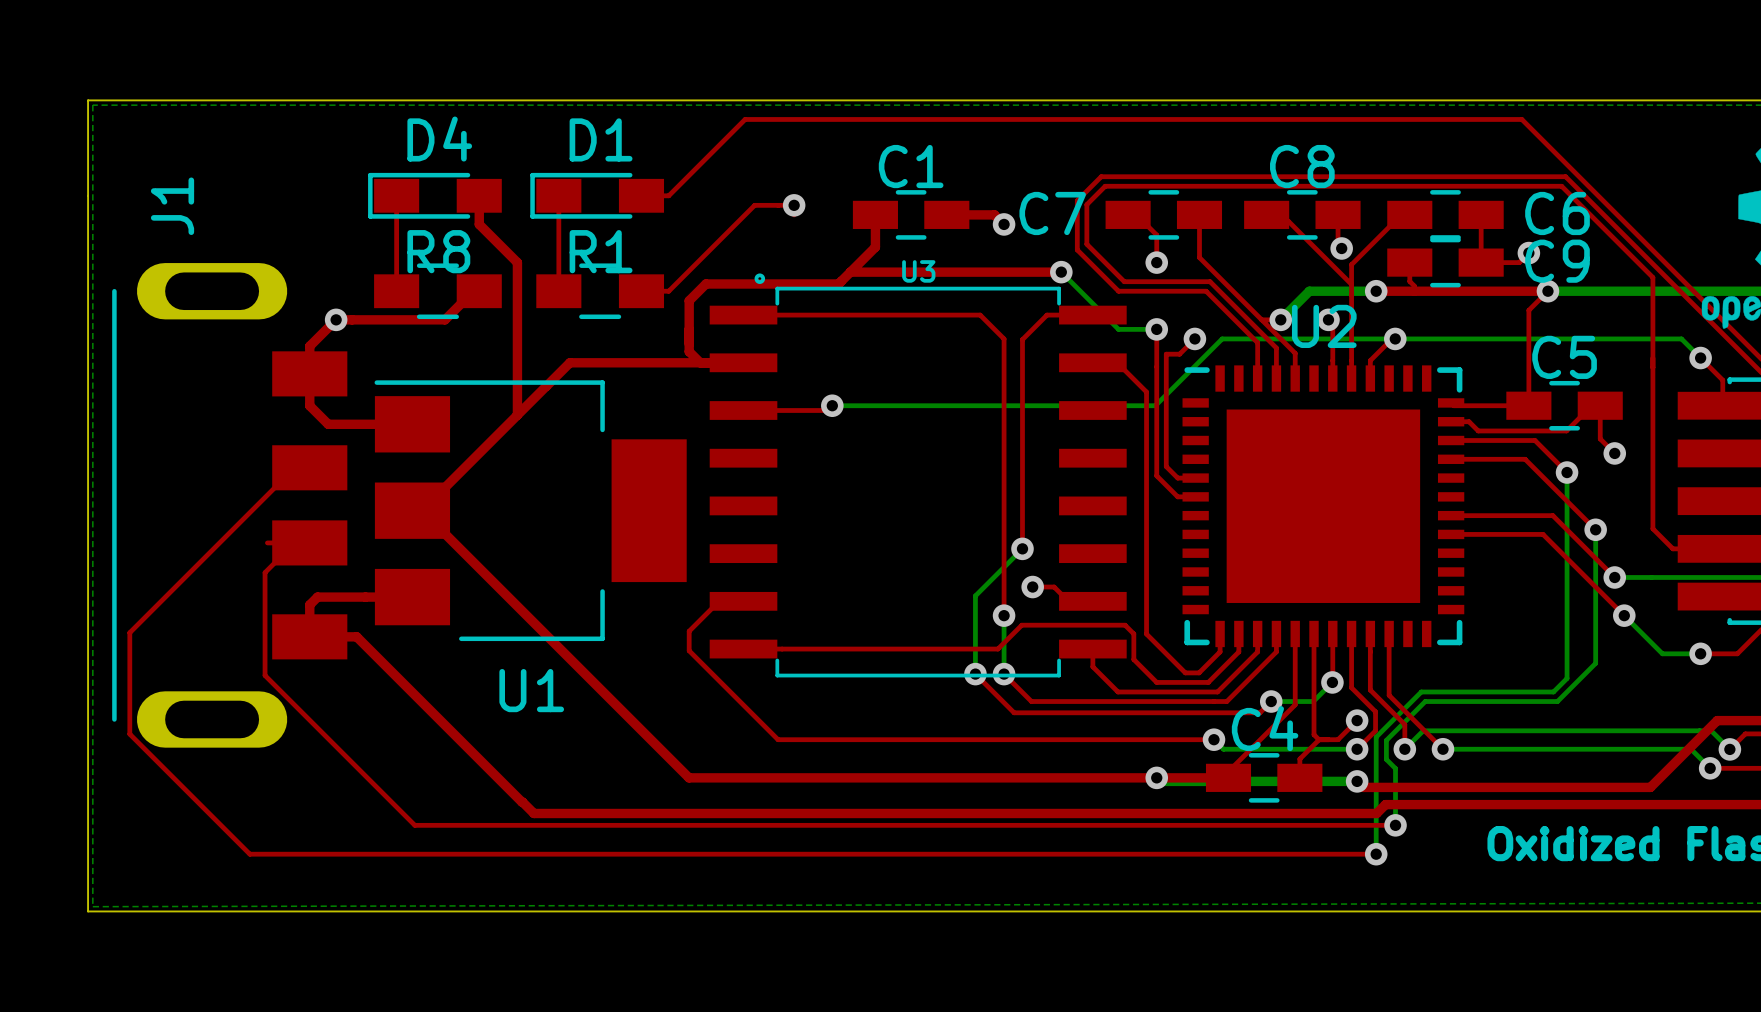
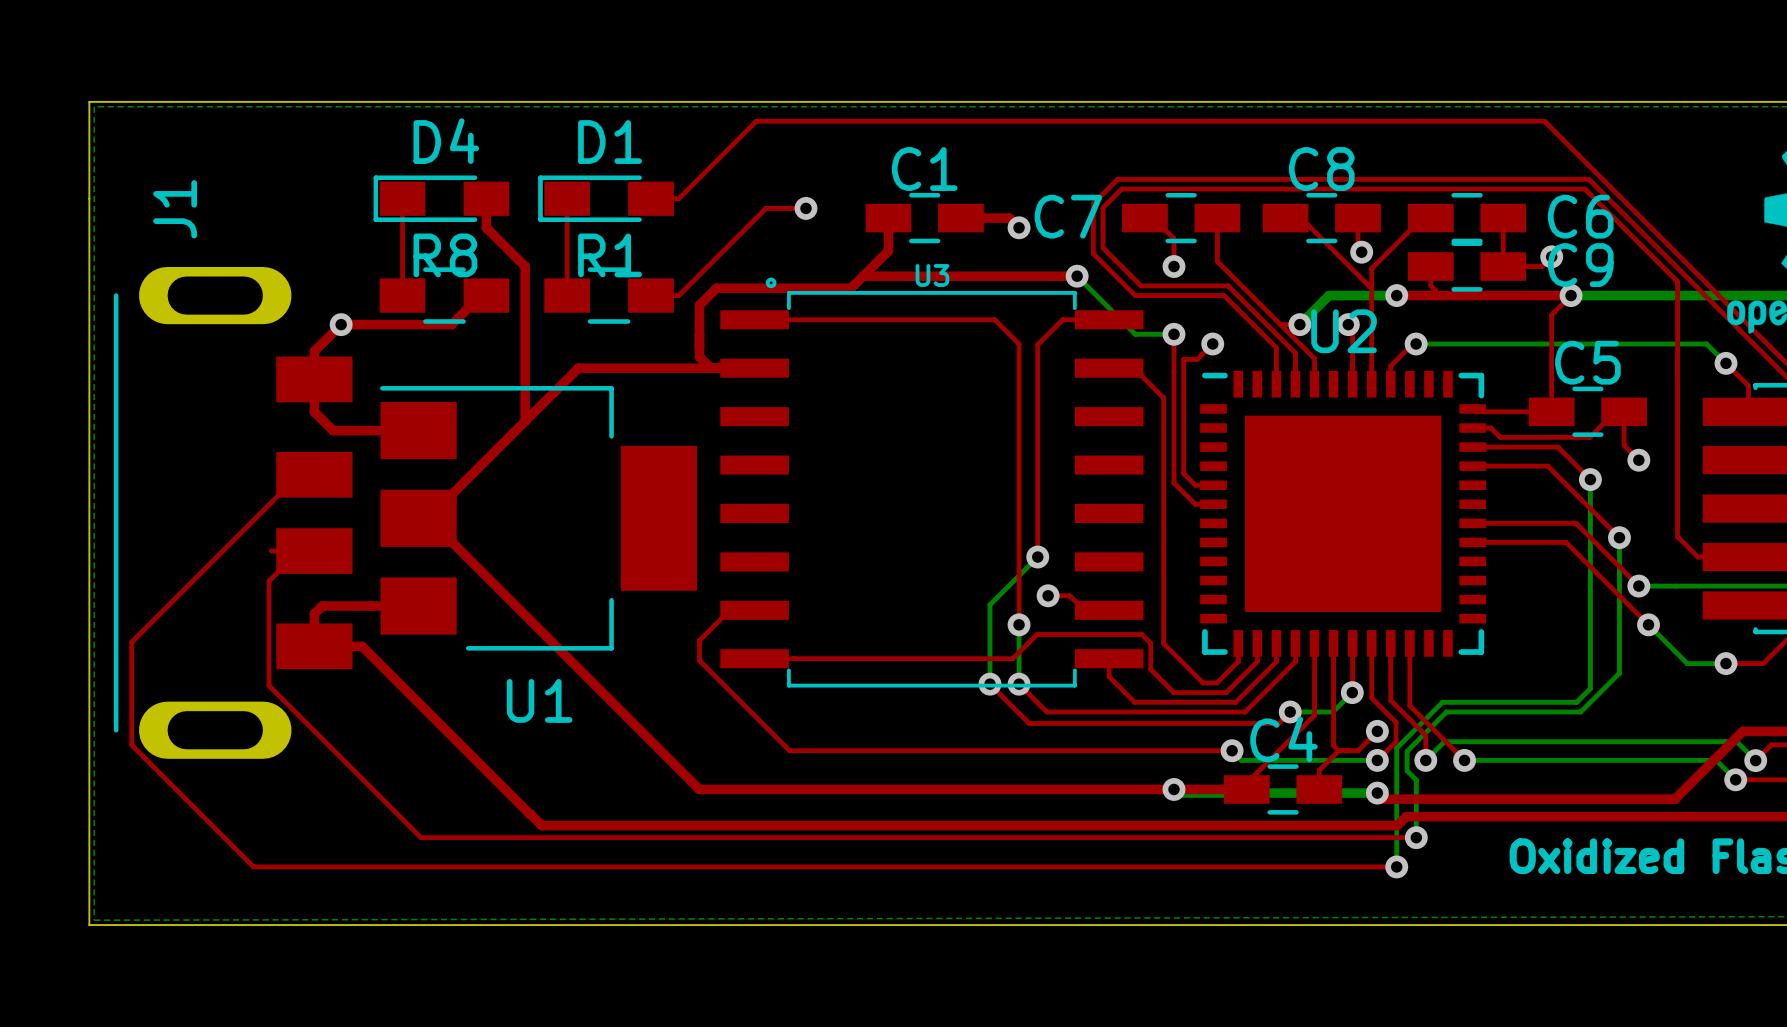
bottom track: (1395, 338) (1222, 338) (1155, 405) (832, 405) -> none
top track: (832, 405) (827, 410) (743, 410) -> none
via: (832, 405) -> none

